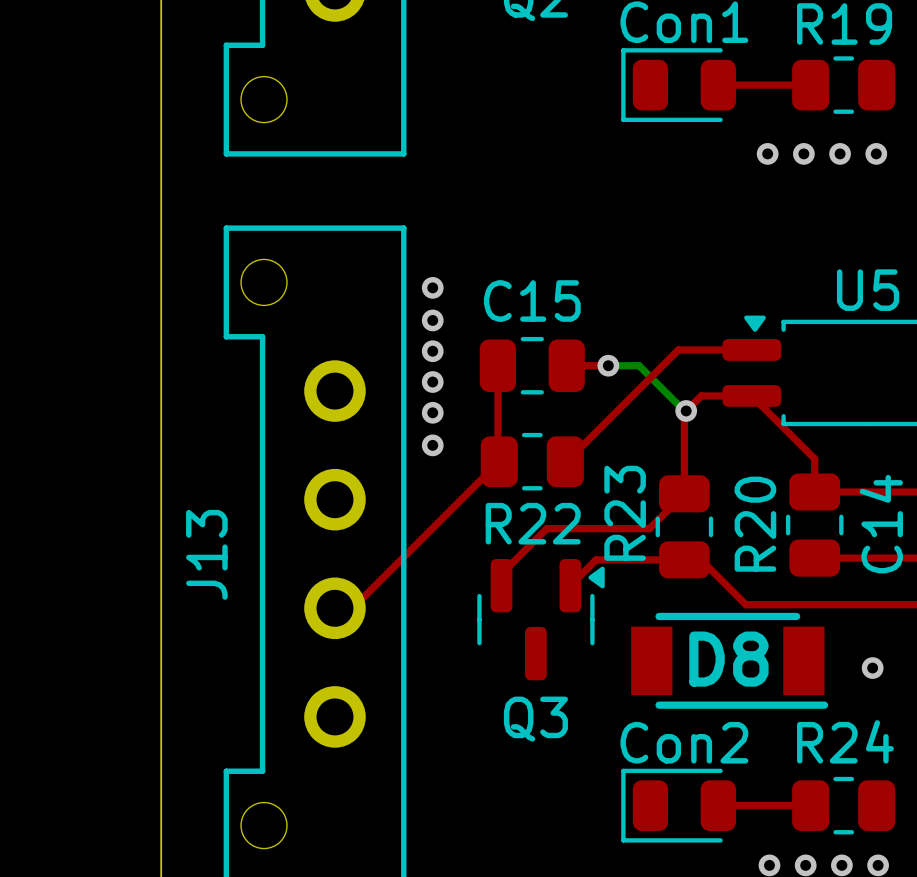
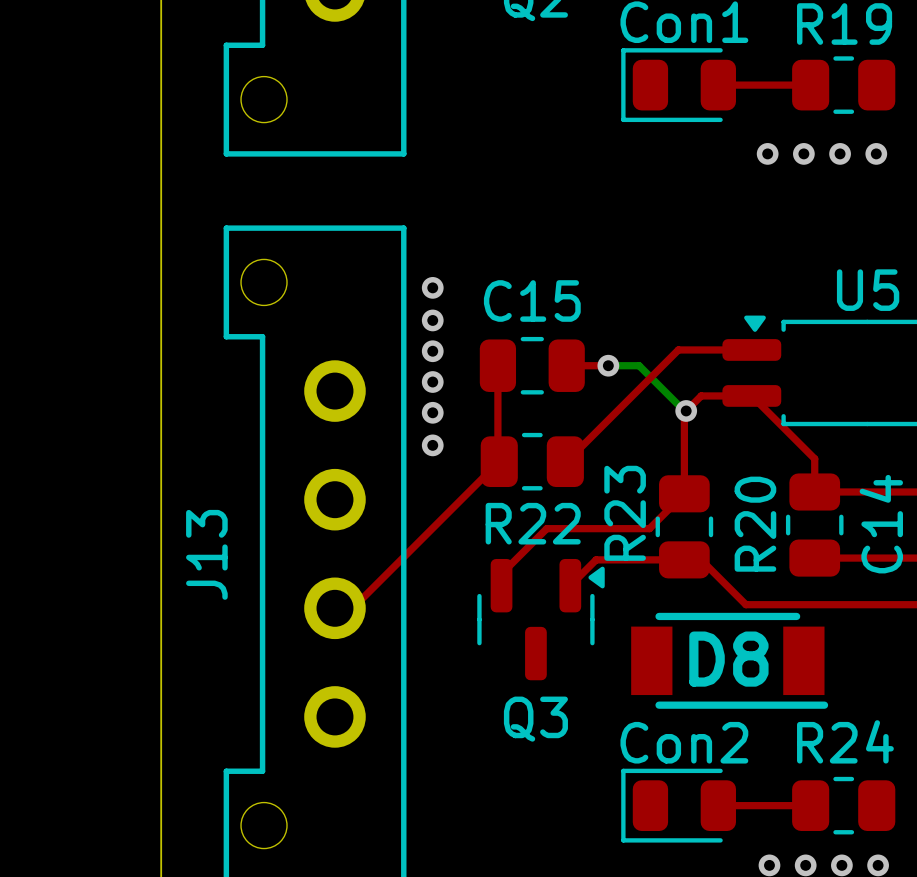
via: (872, 668) -> none

